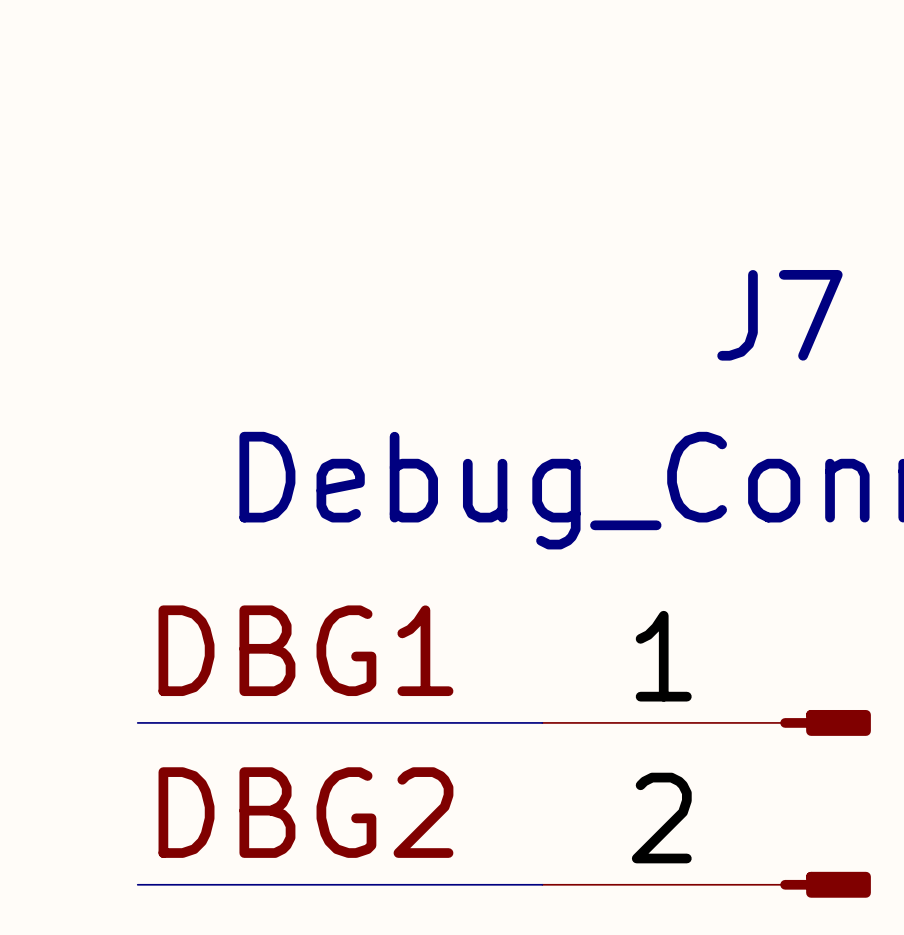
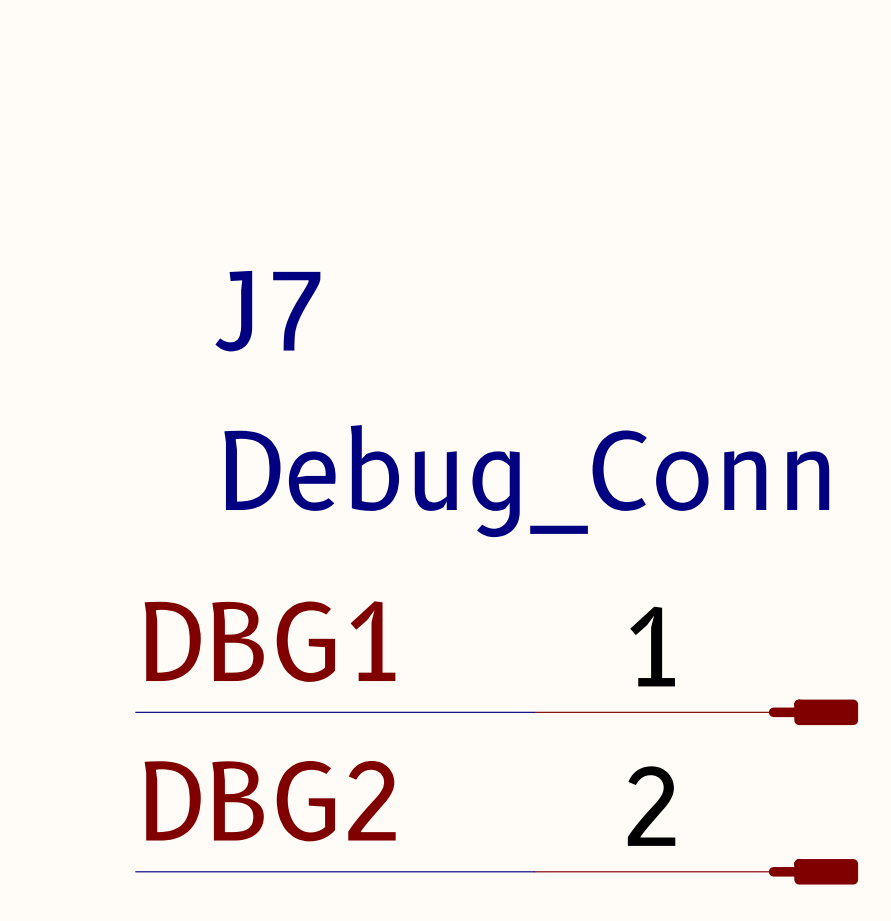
J7 name position: J7 (779, 315) -> J7 (267, 311)

